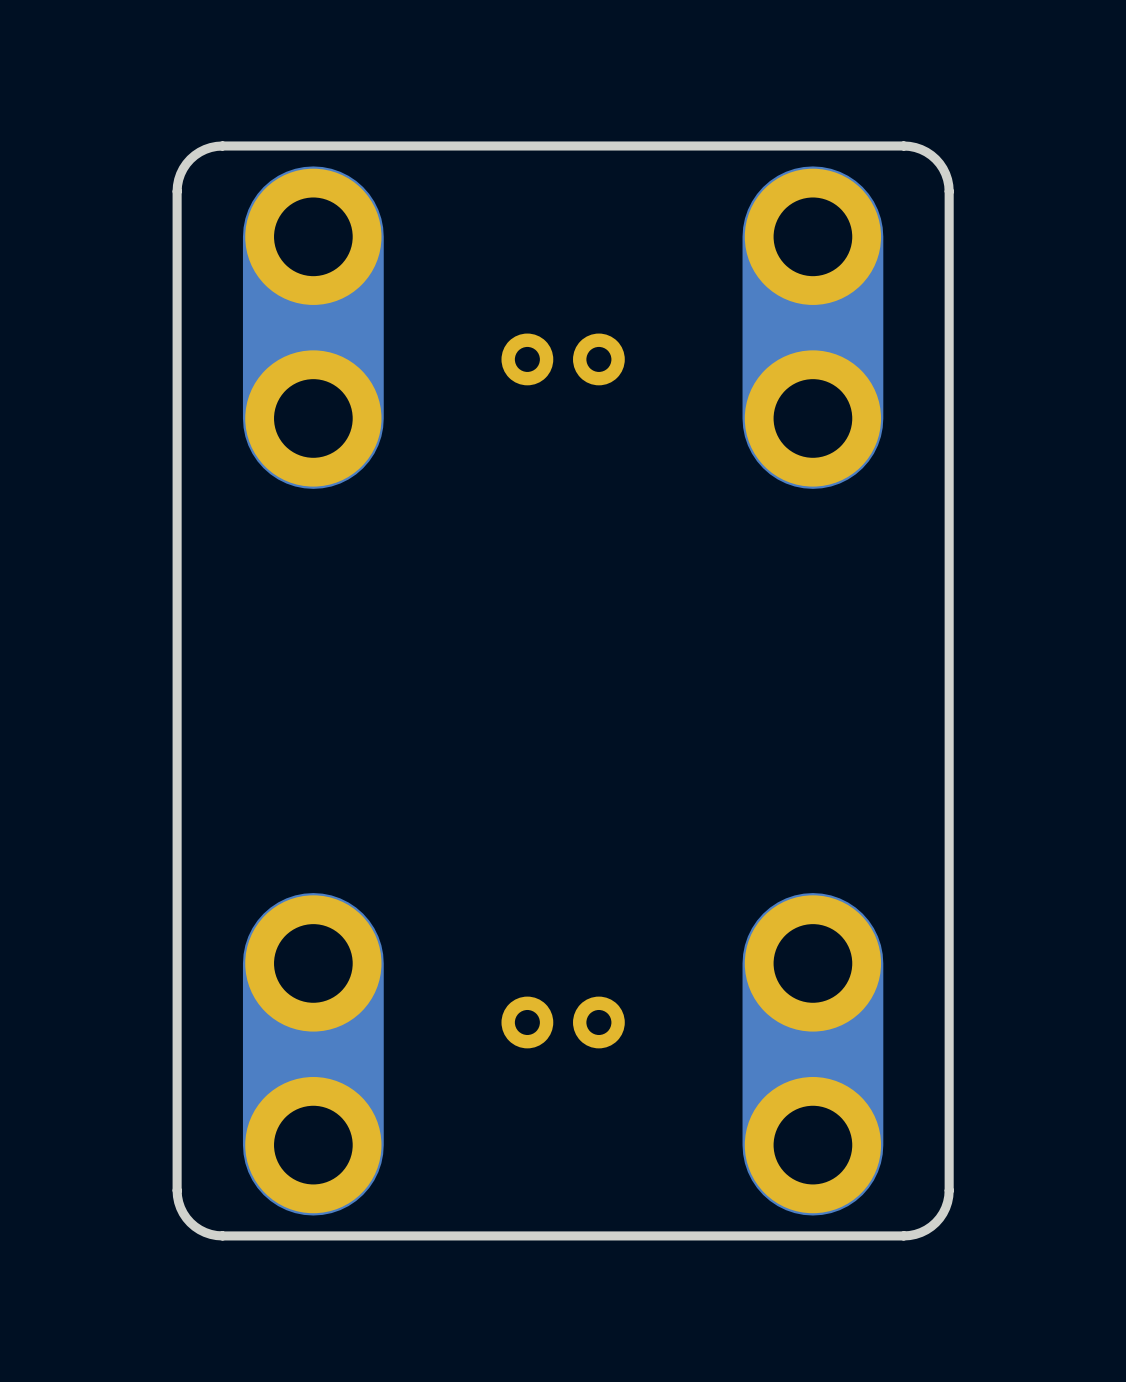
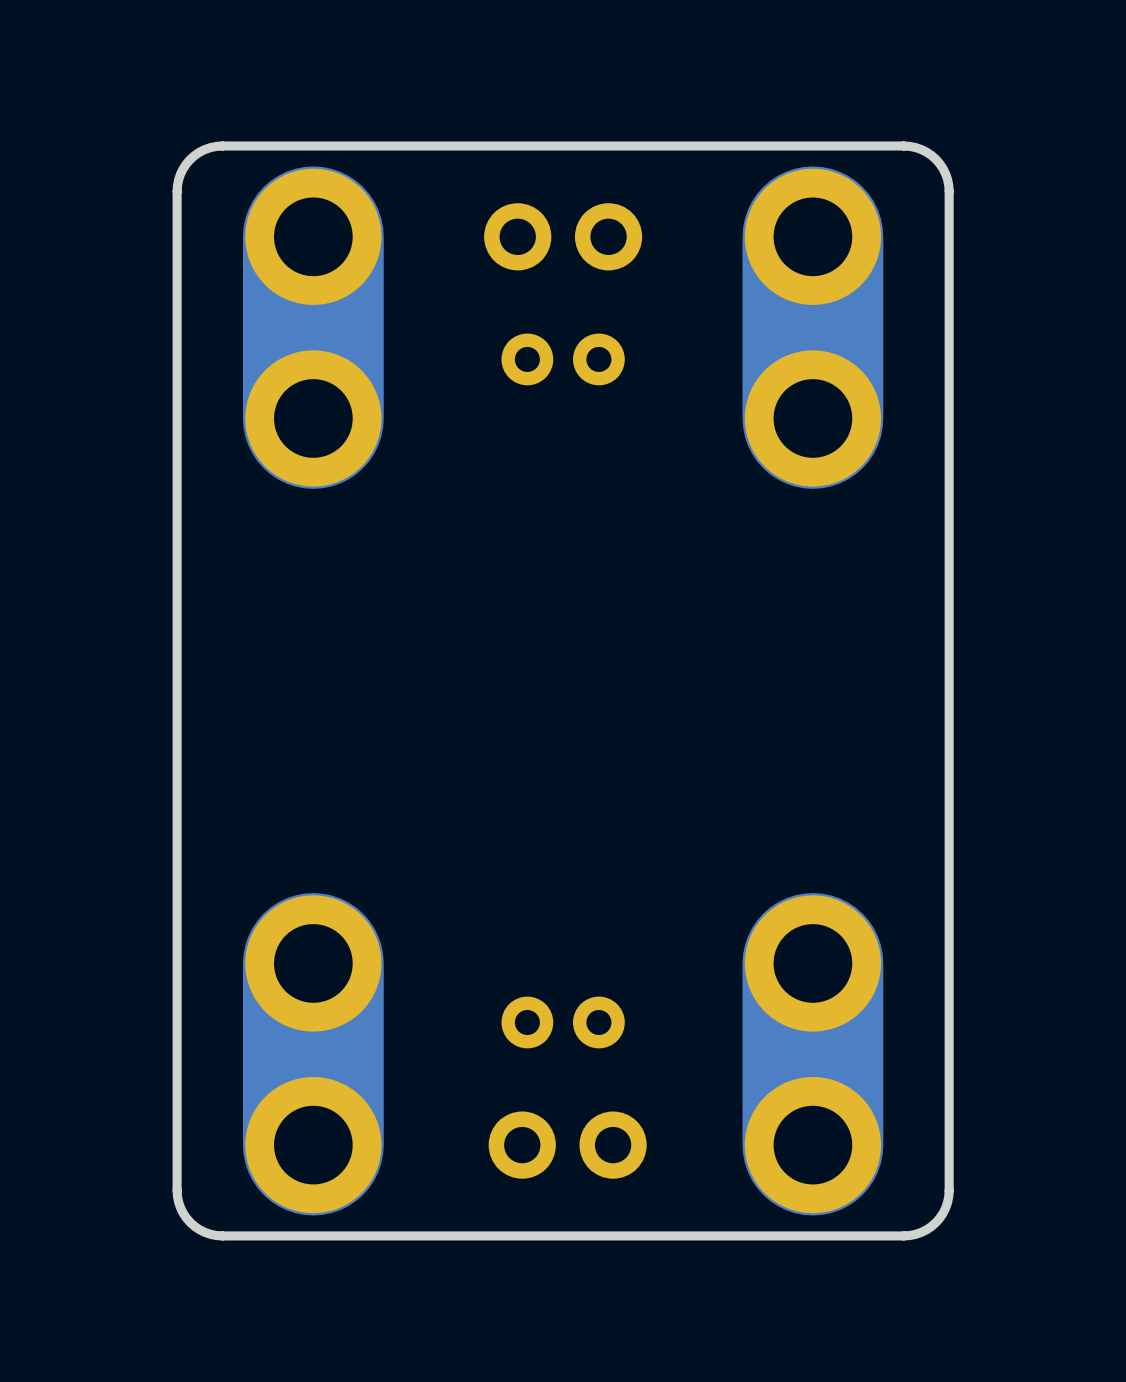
part: none -> (563, 236)
part: none -> (567, 1145)

